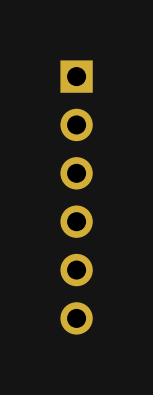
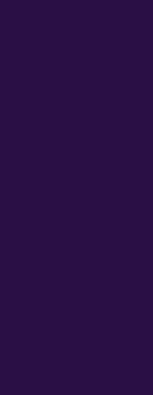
part: (76, 197) -> none

